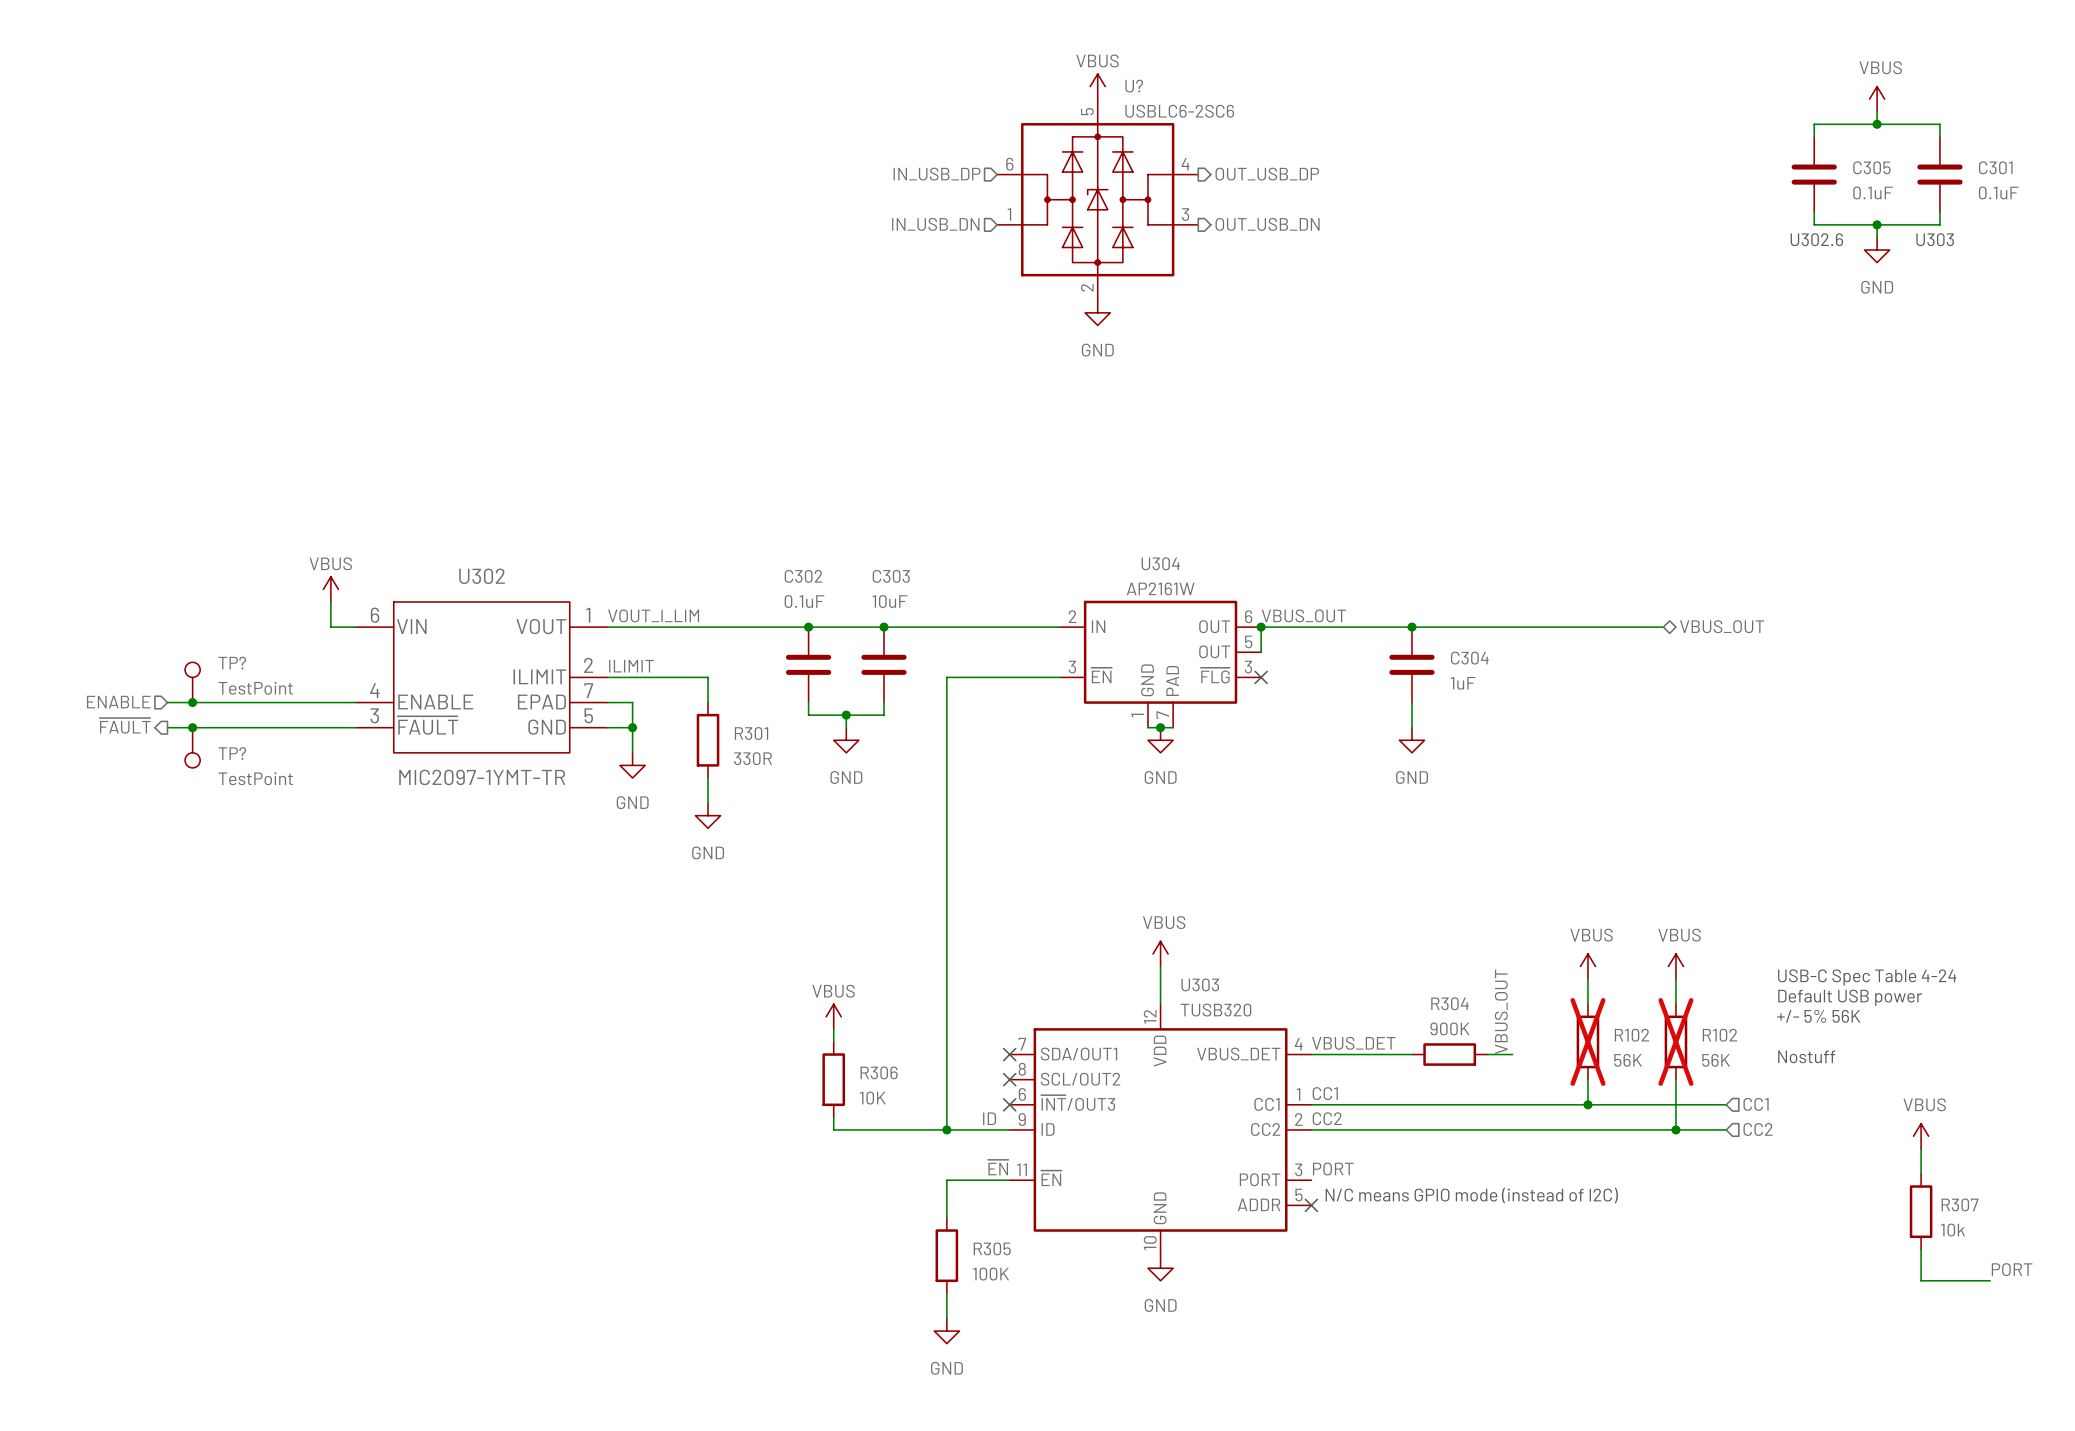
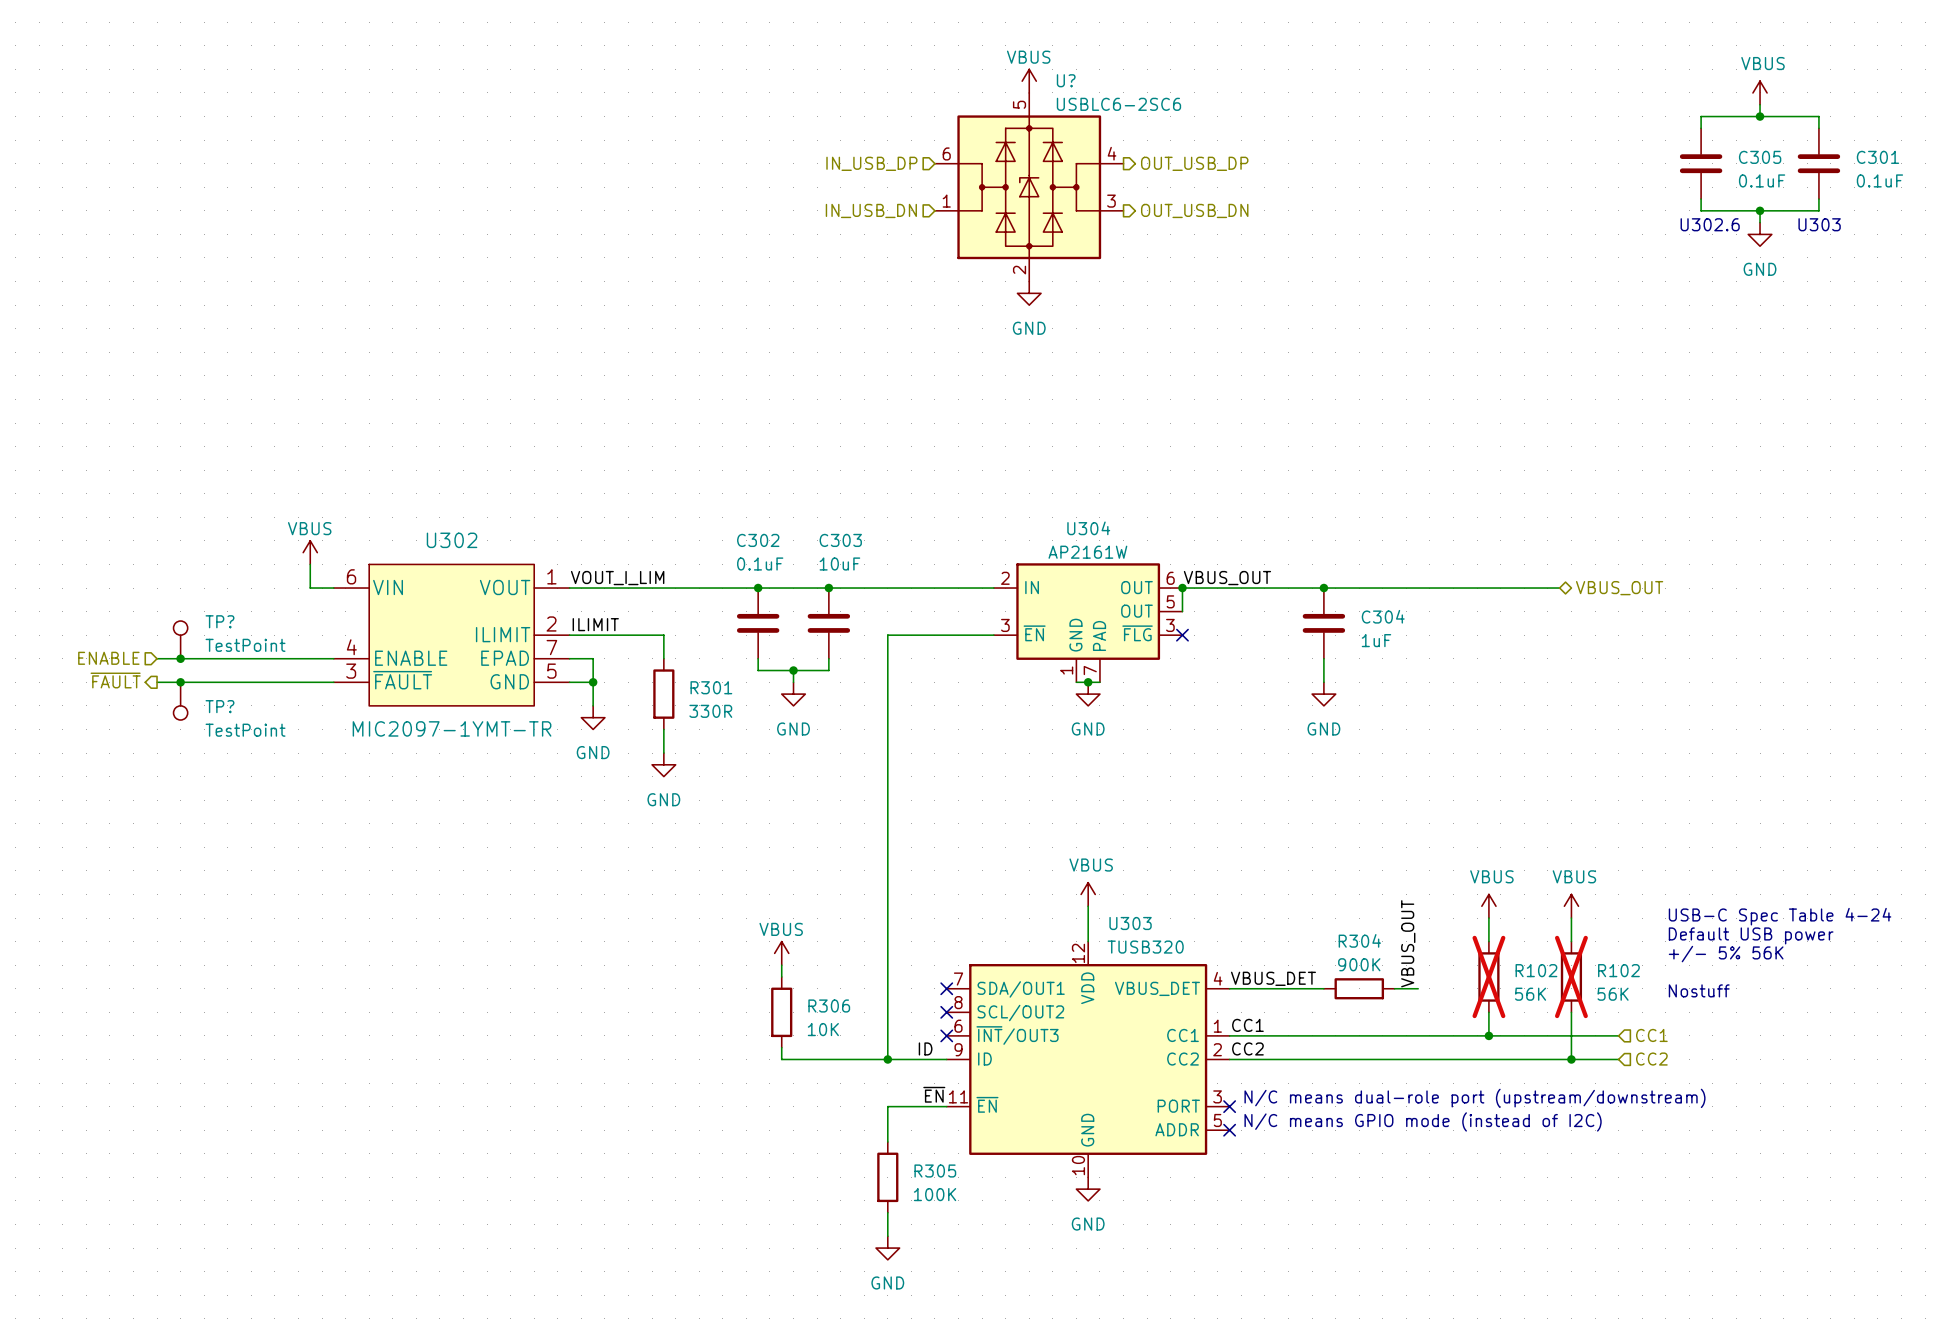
power symbol: VBUS (1921, 1136) -> none
wire: (1921, 1148) (1921, 1173) -> none
label: PORT (1333, 1169) -> none
text: none -> N/C means dual-role port (upstream/downstream) (1474, 1098)
no-connect mark: none -> (1229, 1106)
R307: 10k (1921, 1211) -> none
wire: (1921, 1249) (1921, 1280) (1990, 1280) -> none
label: PORT (2012, 1269) -> none

